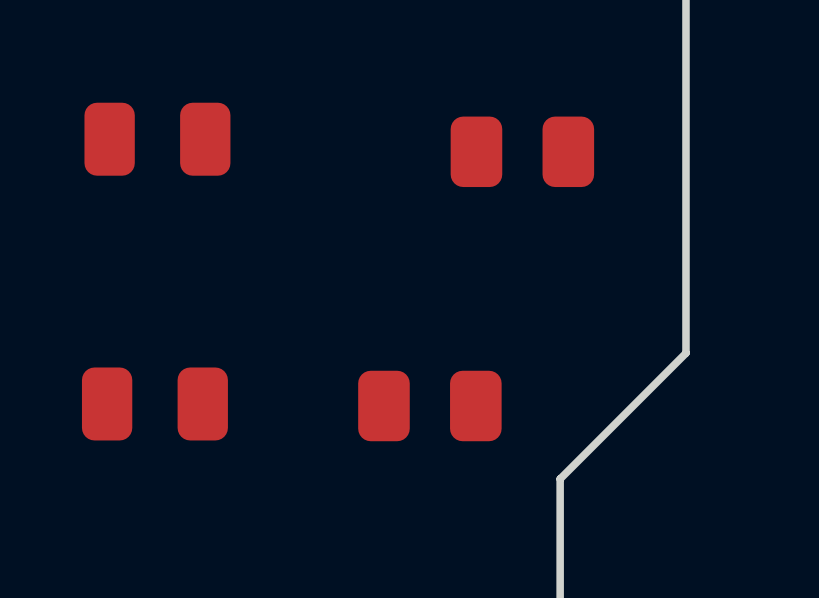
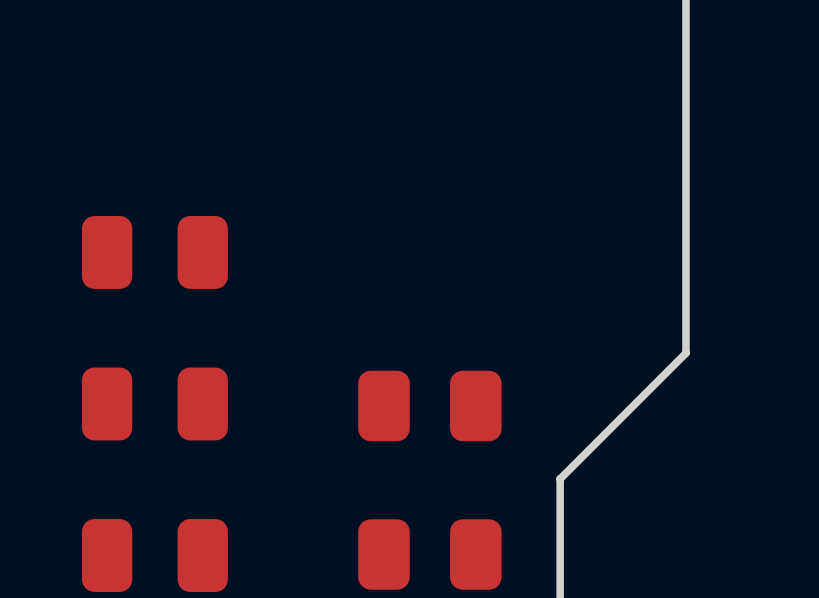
part position: (157, 139) -> (154, 252)
part position: (522, 151) -> (429, 554)
part: none -> (154, 555)

